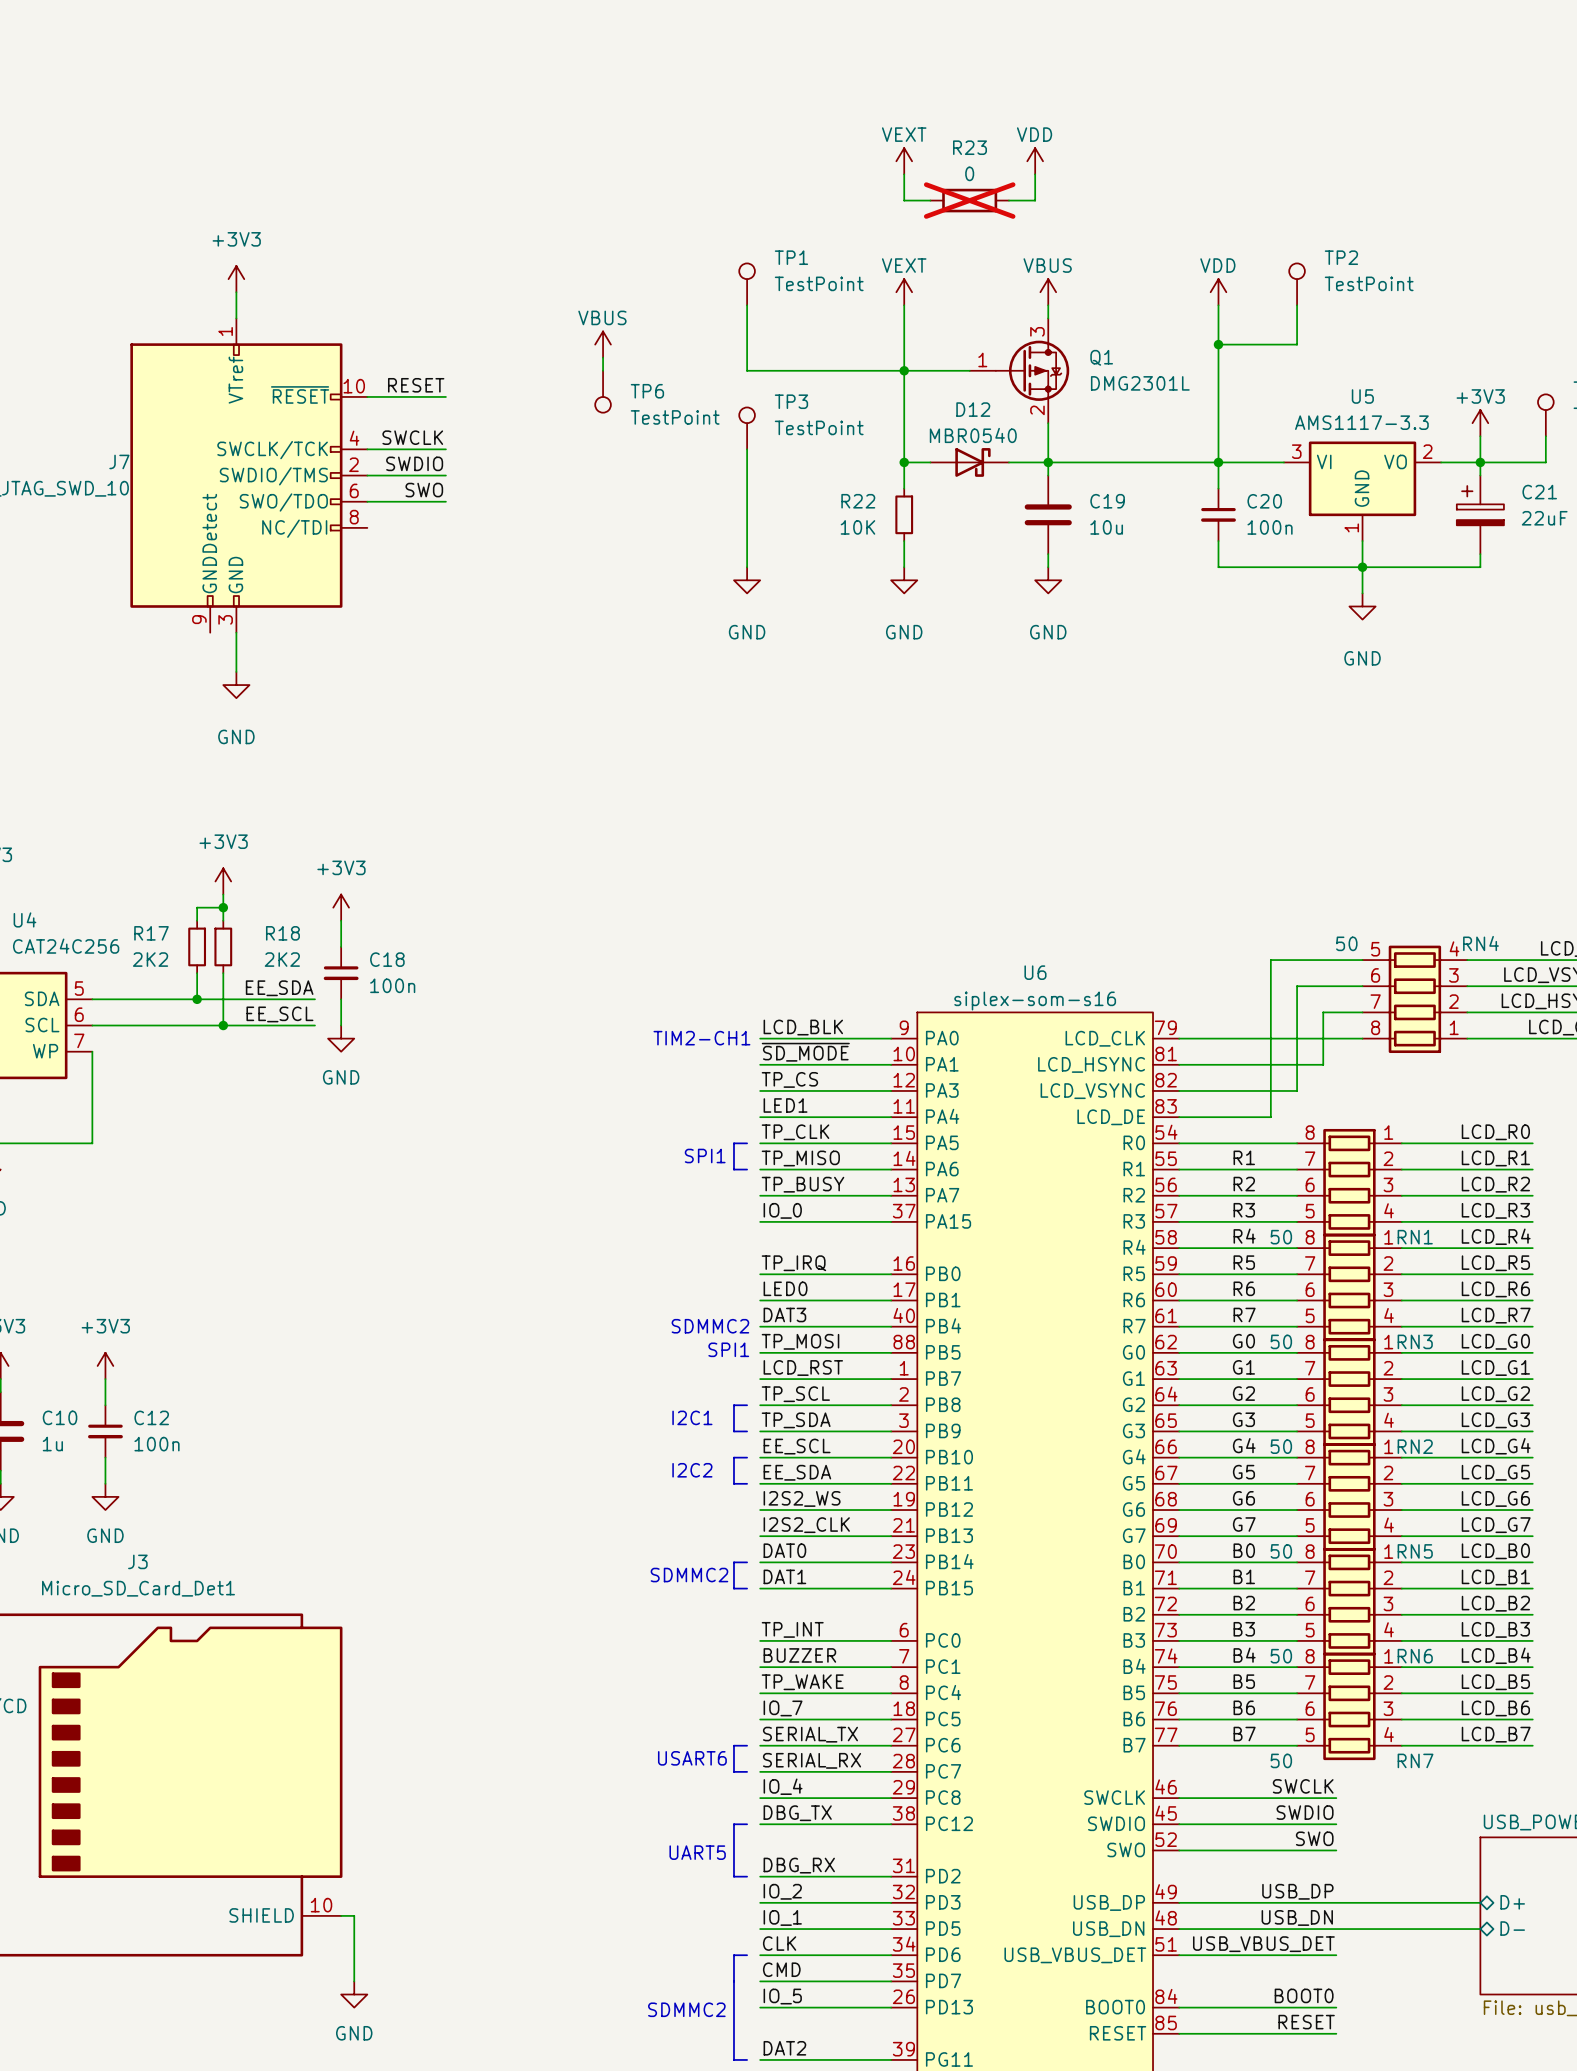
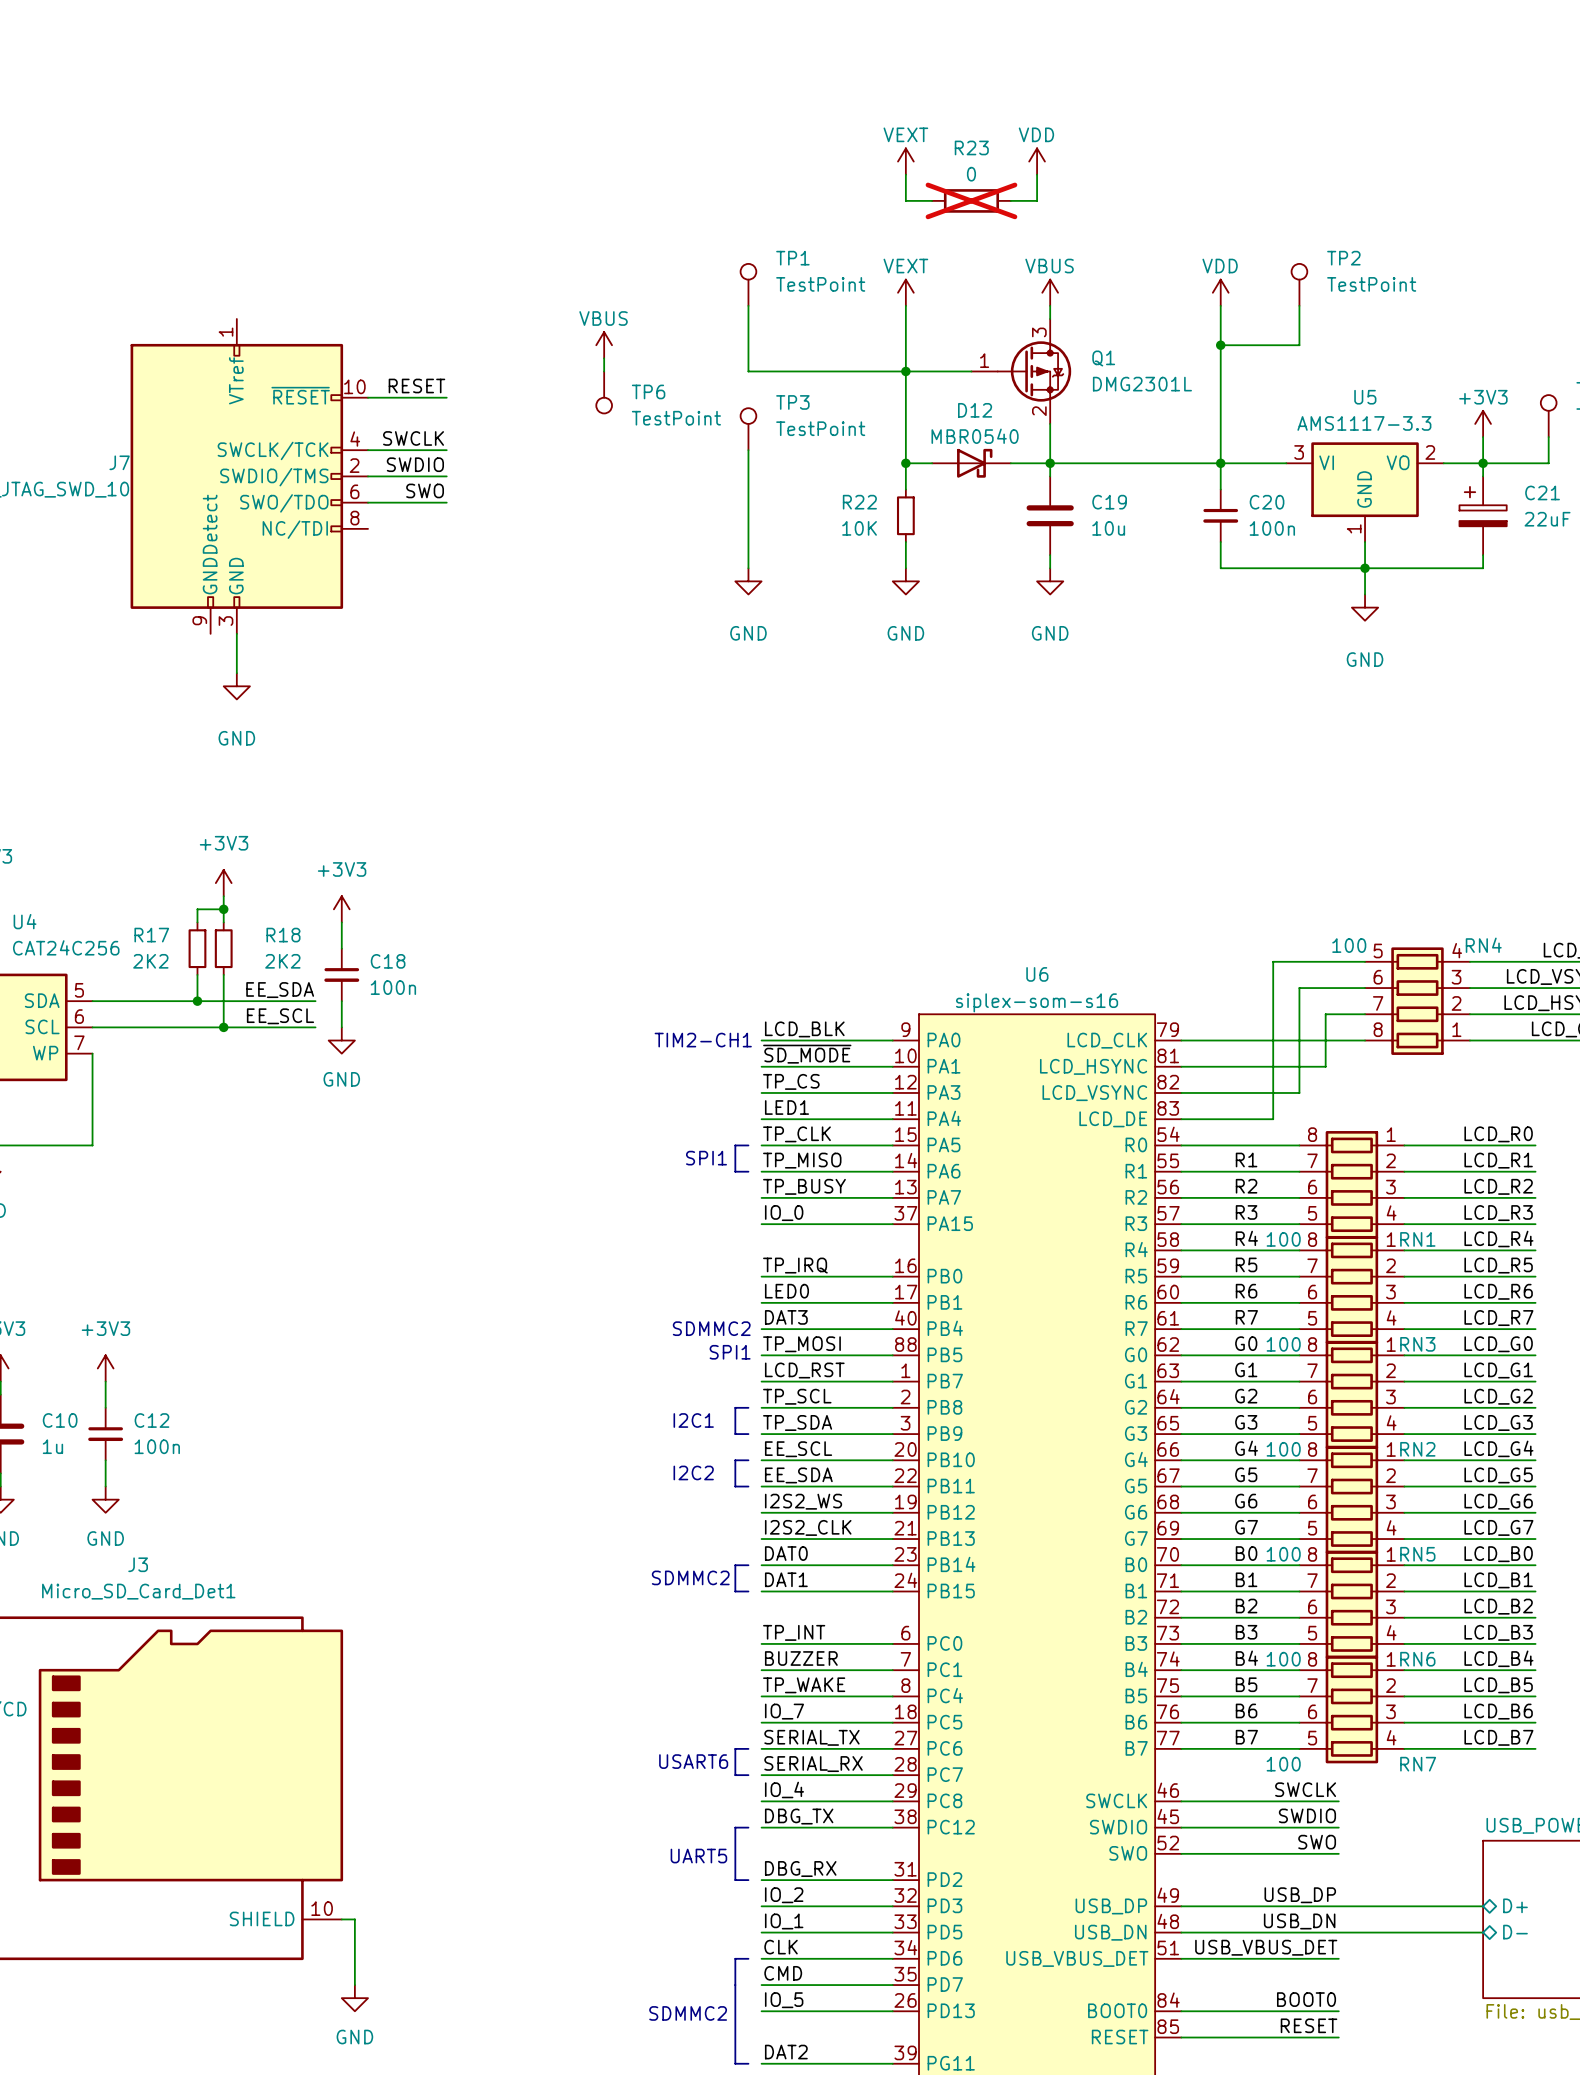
power symbol: +3V3 (236, 279) -> none
wire: (236, 292) (236, 318) -> none
RN4 value: 50 (1346, 943) -> 100 (1349, 945)
RN1 value: 50 (1281, 1237) -> 100 (1283, 1239)
RN3 value: 50 (1281, 1341) -> 100 (1283, 1344)
RN2 value: 50 (1281, 1446) -> 100 (1283, 1449)
RN5 value: 50 (1281, 1551) -> 100 (1283, 1554)
RN6 value: 50 (1281, 1656) -> 100 (1283, 1659)
RN7 value: 50 (1281, 1760) -> 100 (1283, 1764)

